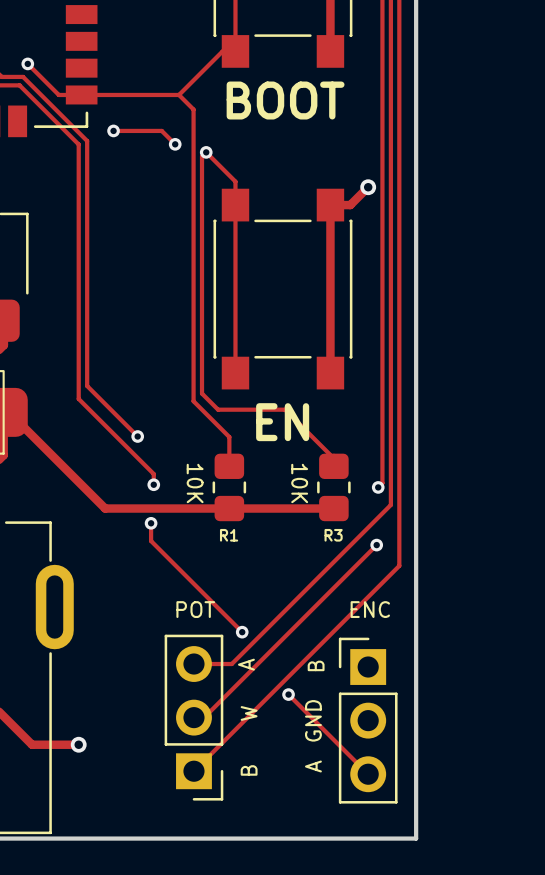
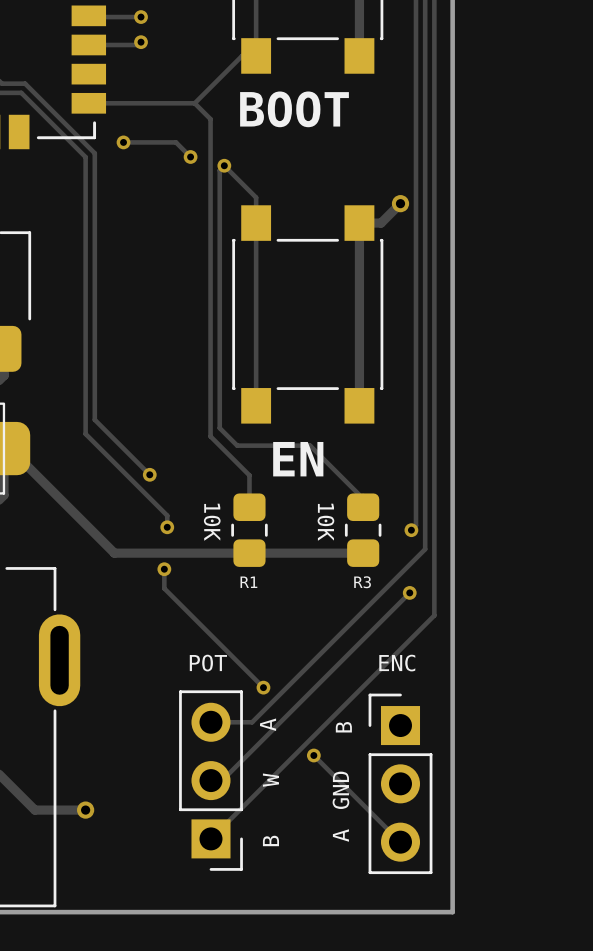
track: none -> (90, 17) (141, 17)
via: none -> (141, 17)
track: none -> (141, 42) (138, 44) (88, 44)
via: none -> (141, 42)
track: (27, 63) (58, 94) (81, 94) -> none
via: (27, 63) -> none

